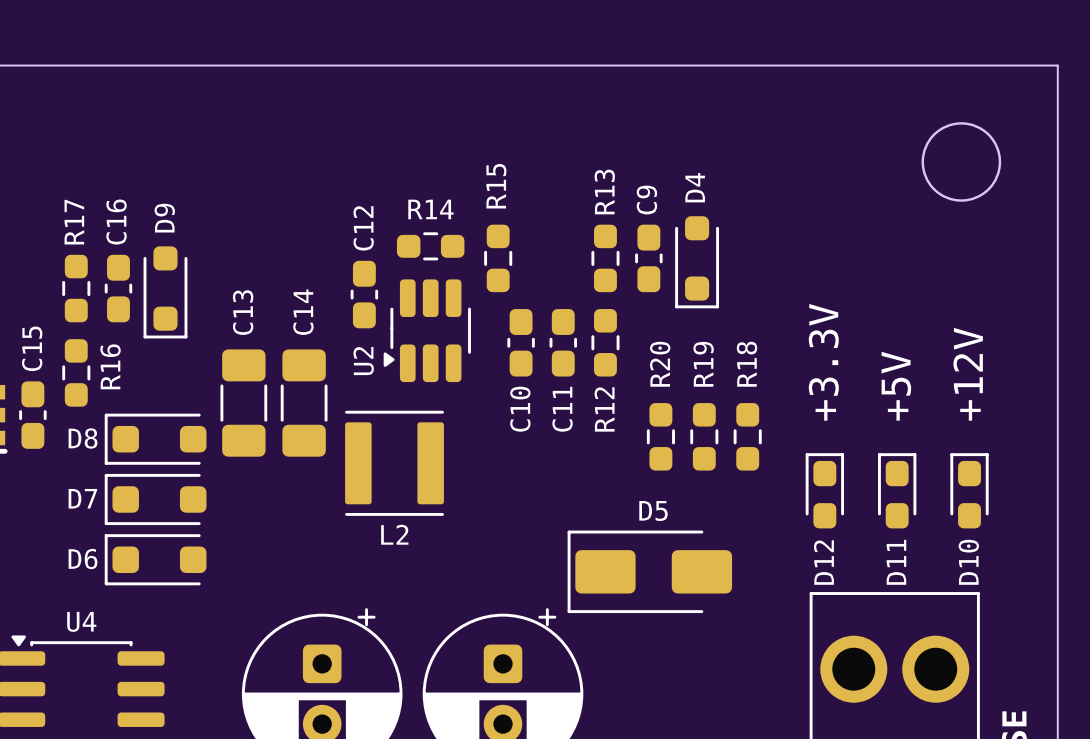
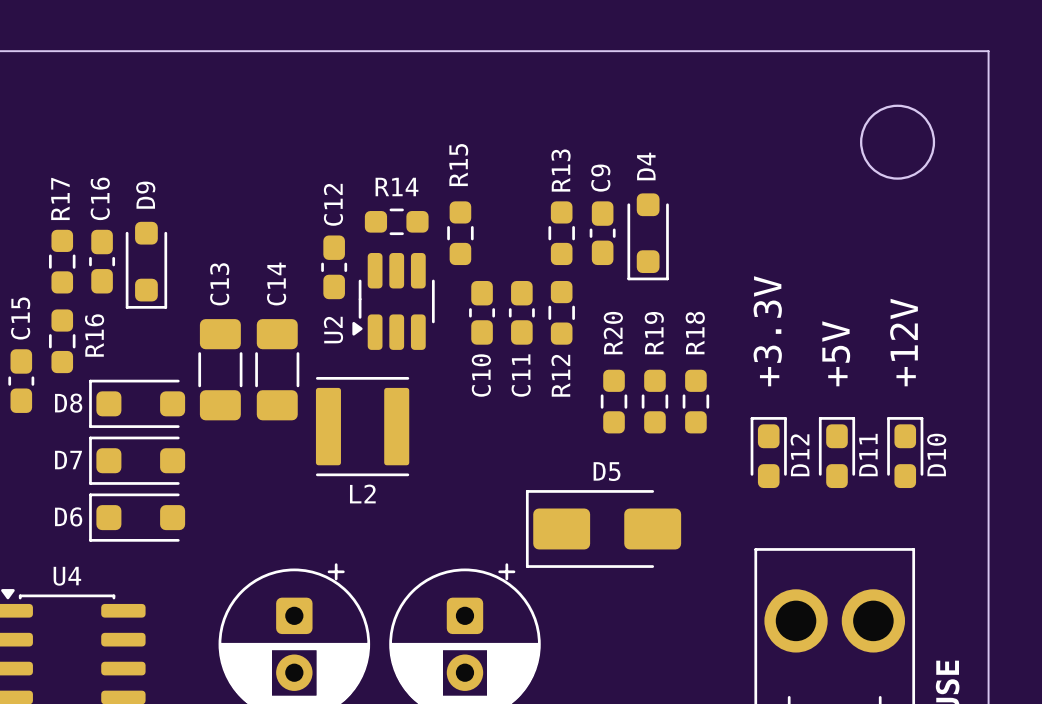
D12 name position: D12 (823, 562) -> D12 (800, 455)
D11 name position: D11 (896, 562) -> D11 (868, 455)
D10 name position: D10 (968, 562) -> D10 (936, 455)

